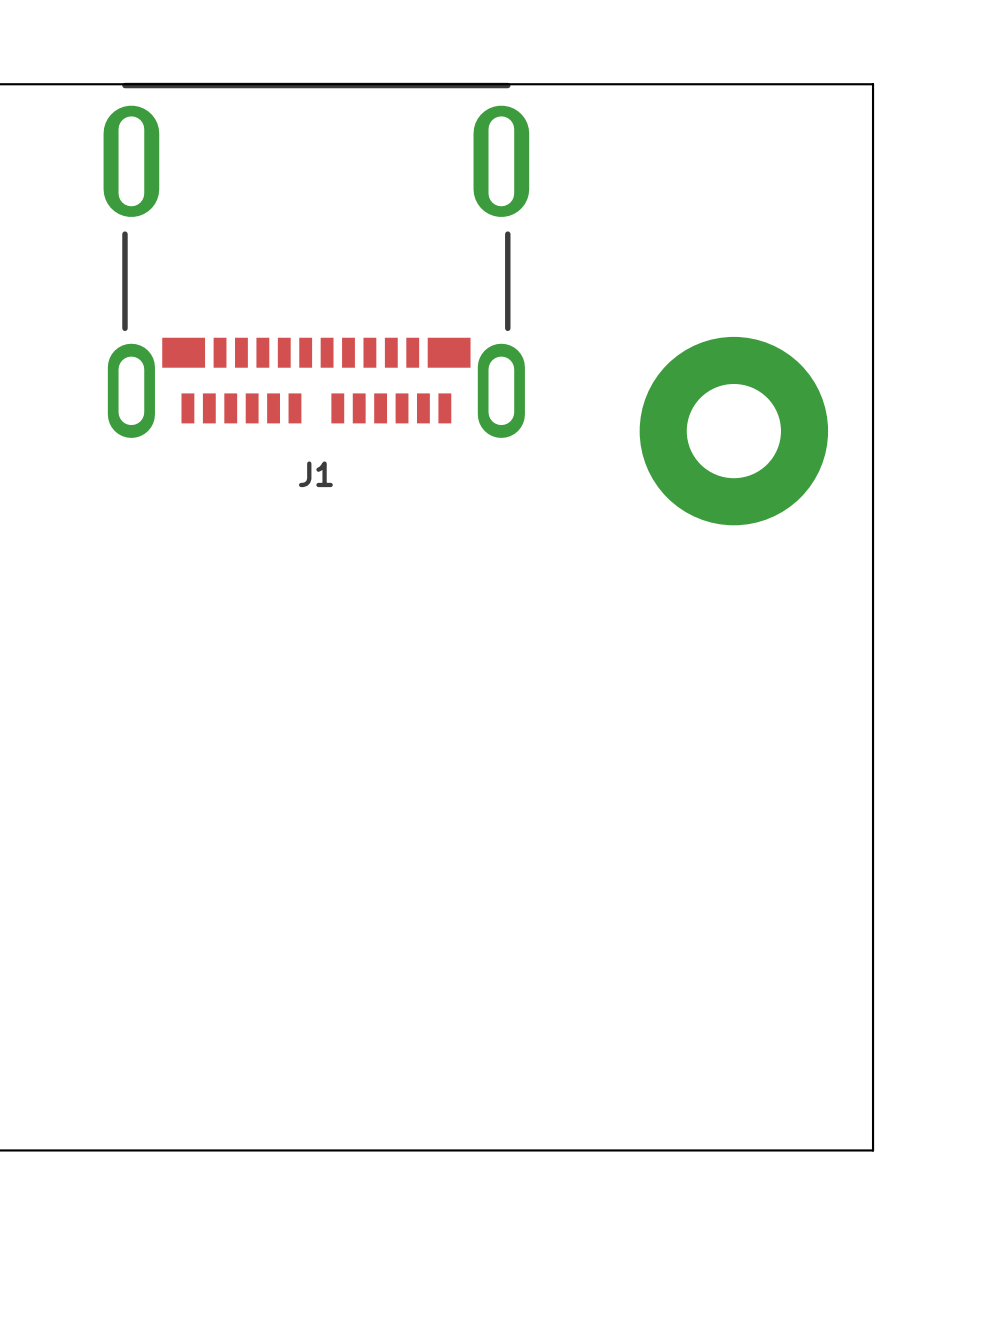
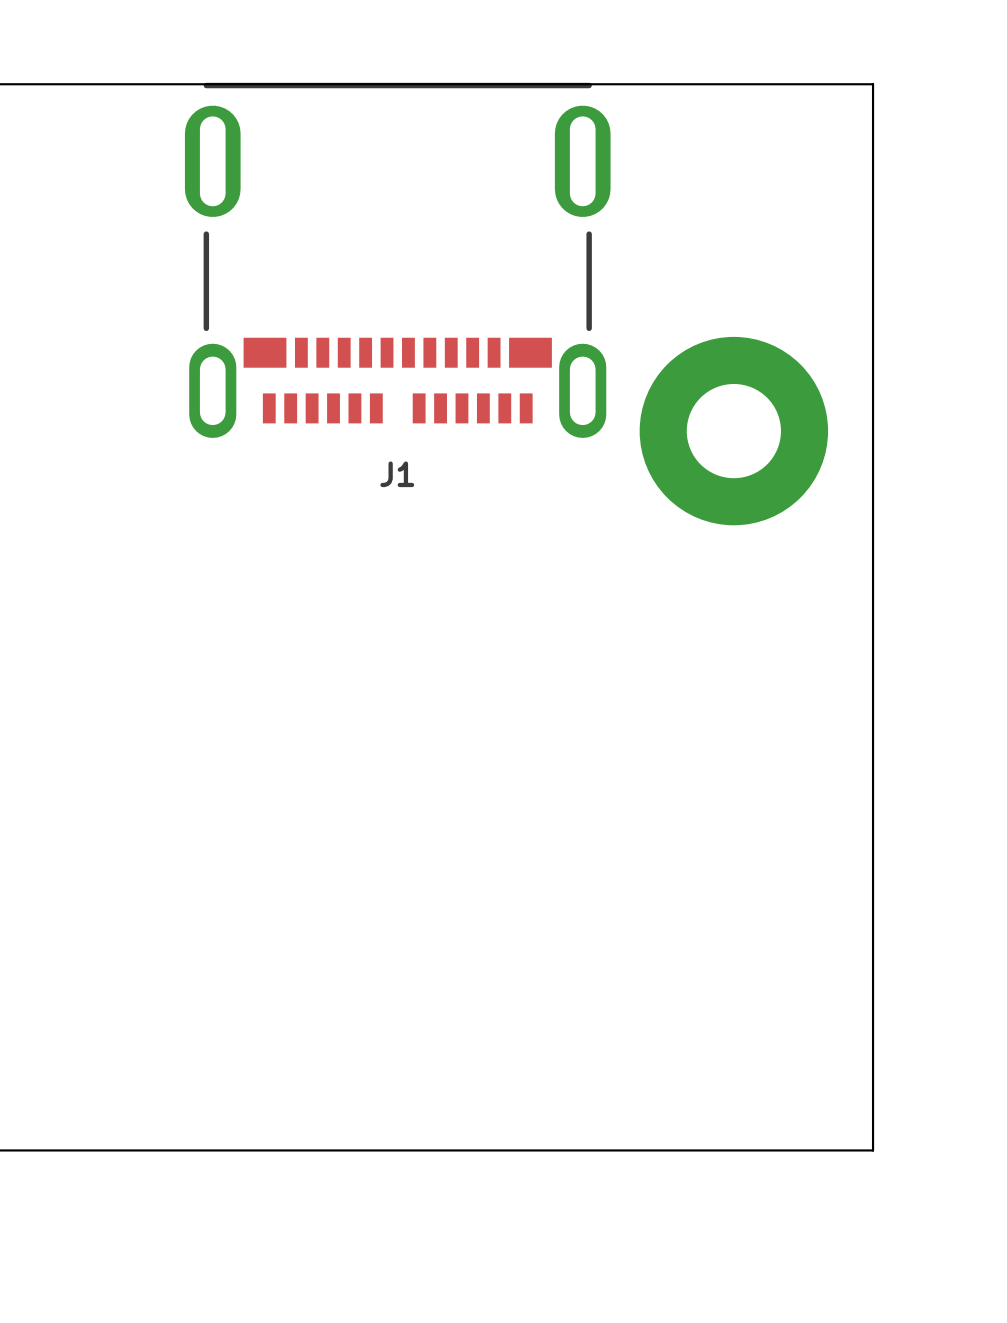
J1 position: (316, 260) -> (397, 260)

